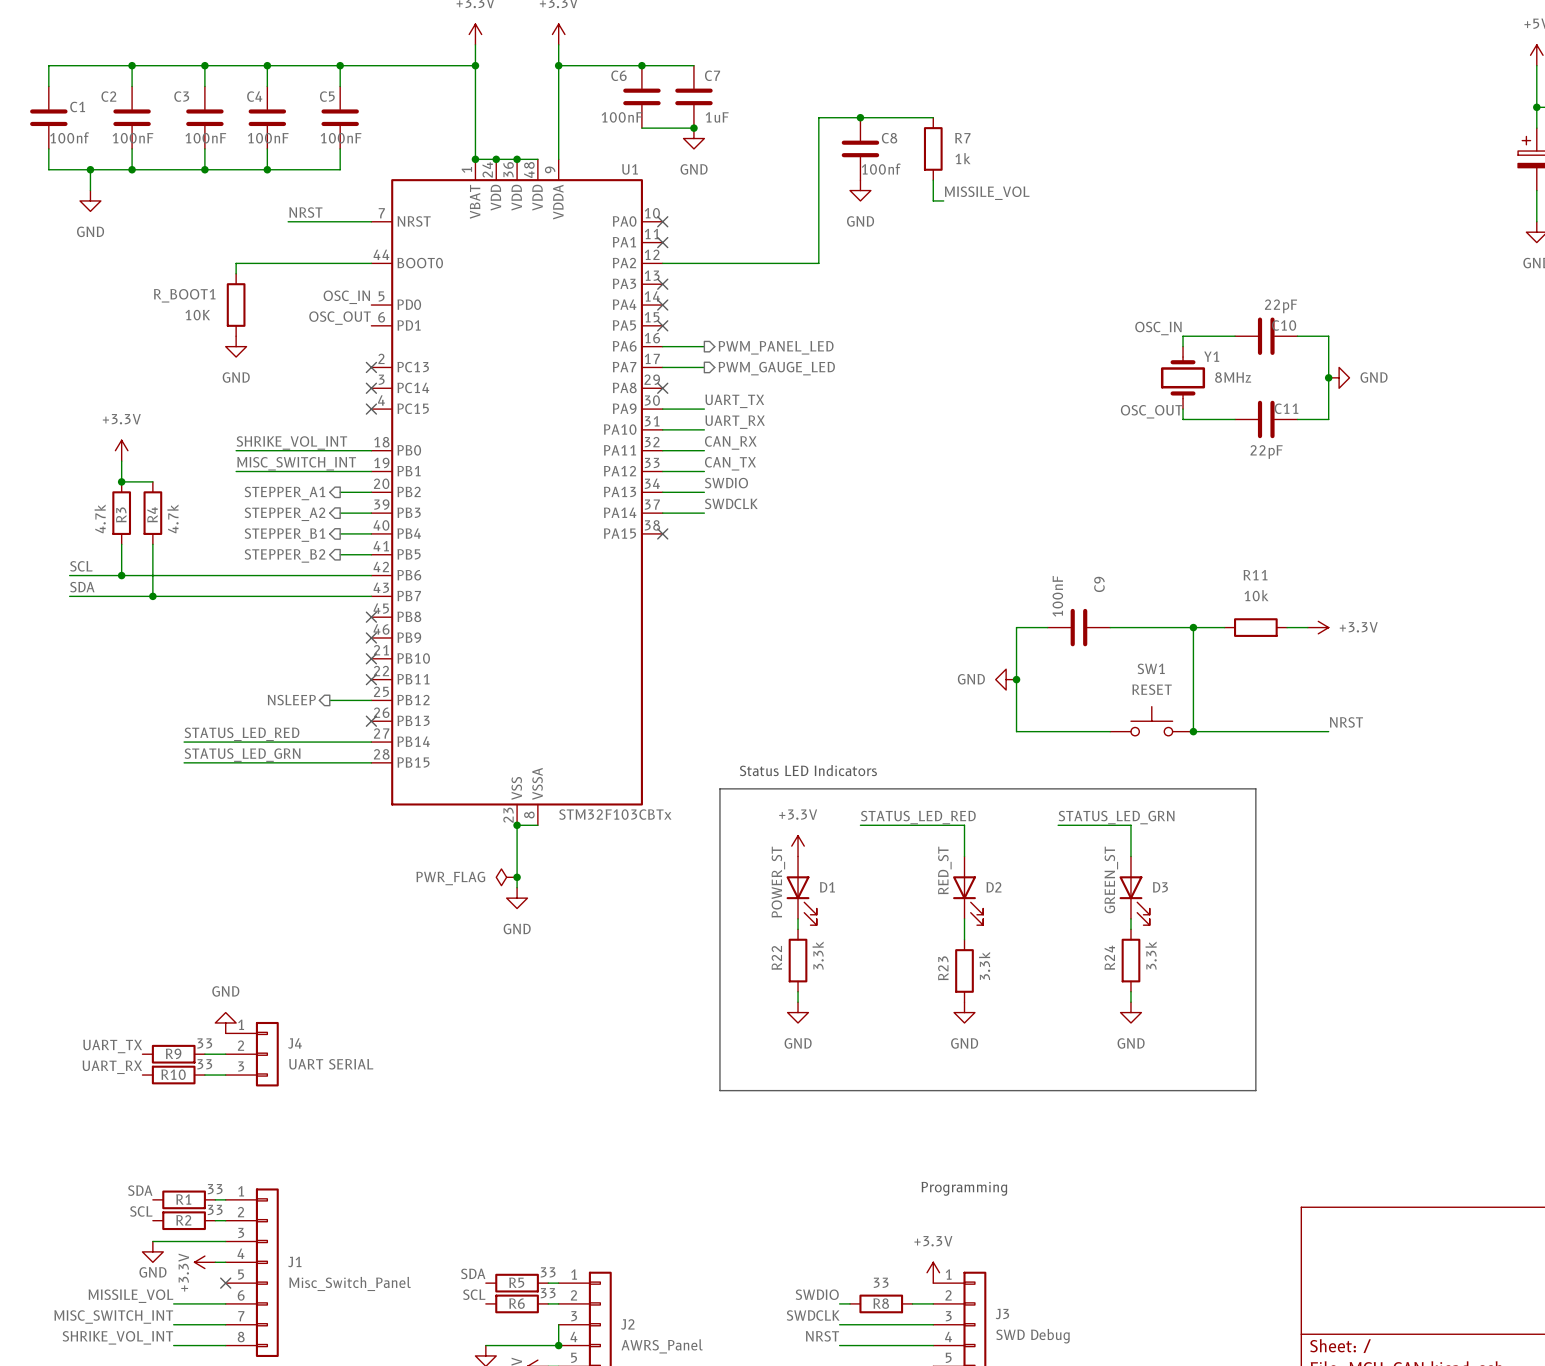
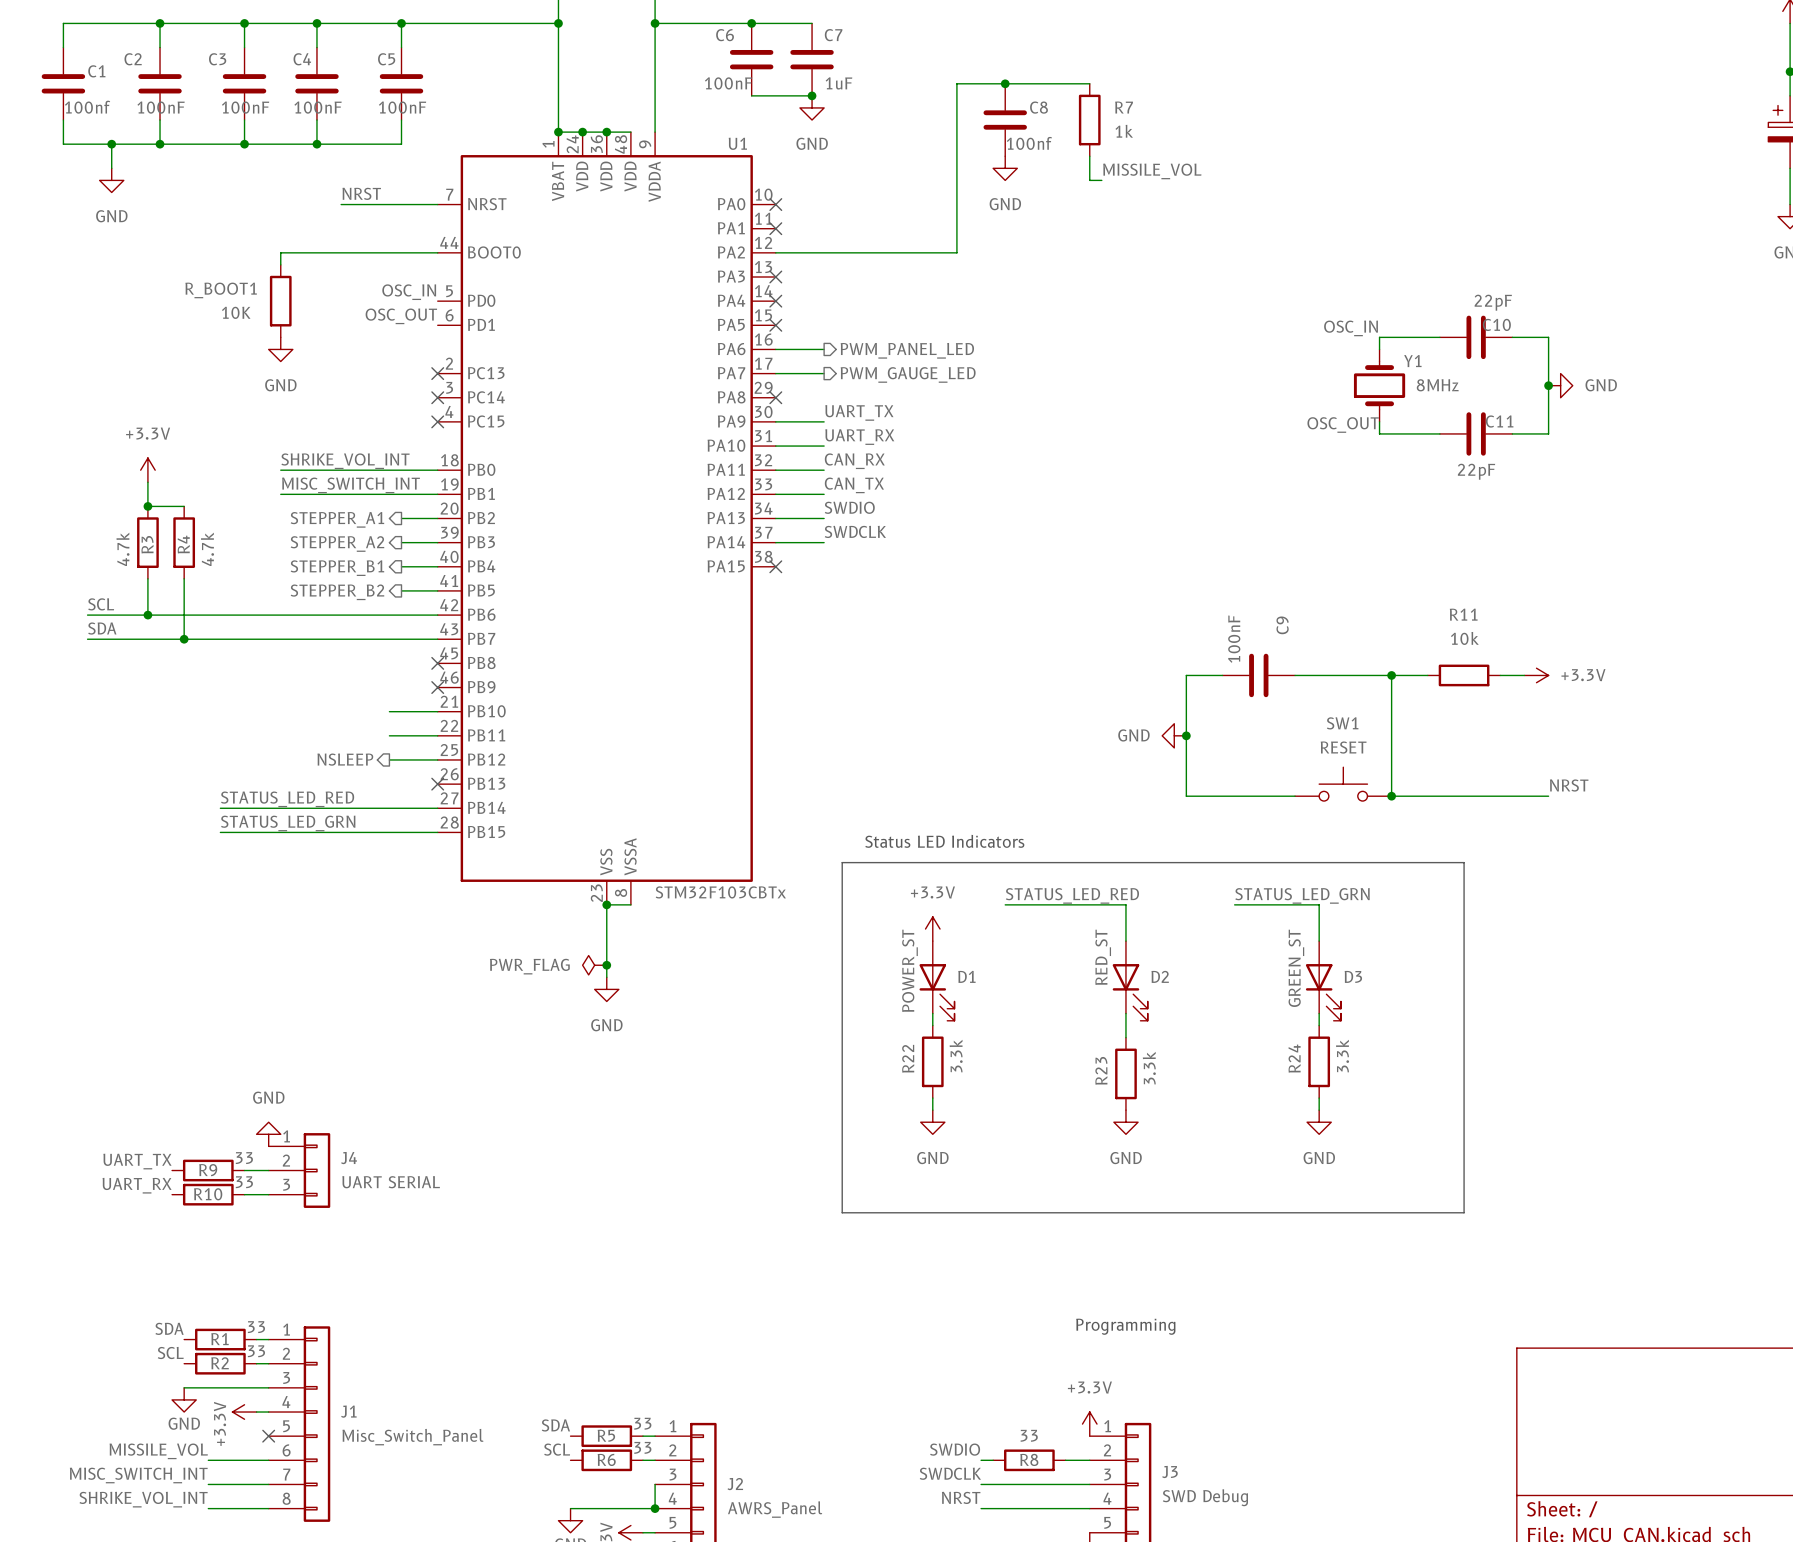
wire: none -> (389, 711) (437, 711)
no-connect mark: (371, 658) -> none
wire: none -> (389, 735) (437, 735)
no-connect mark: (371, 679) -> none

